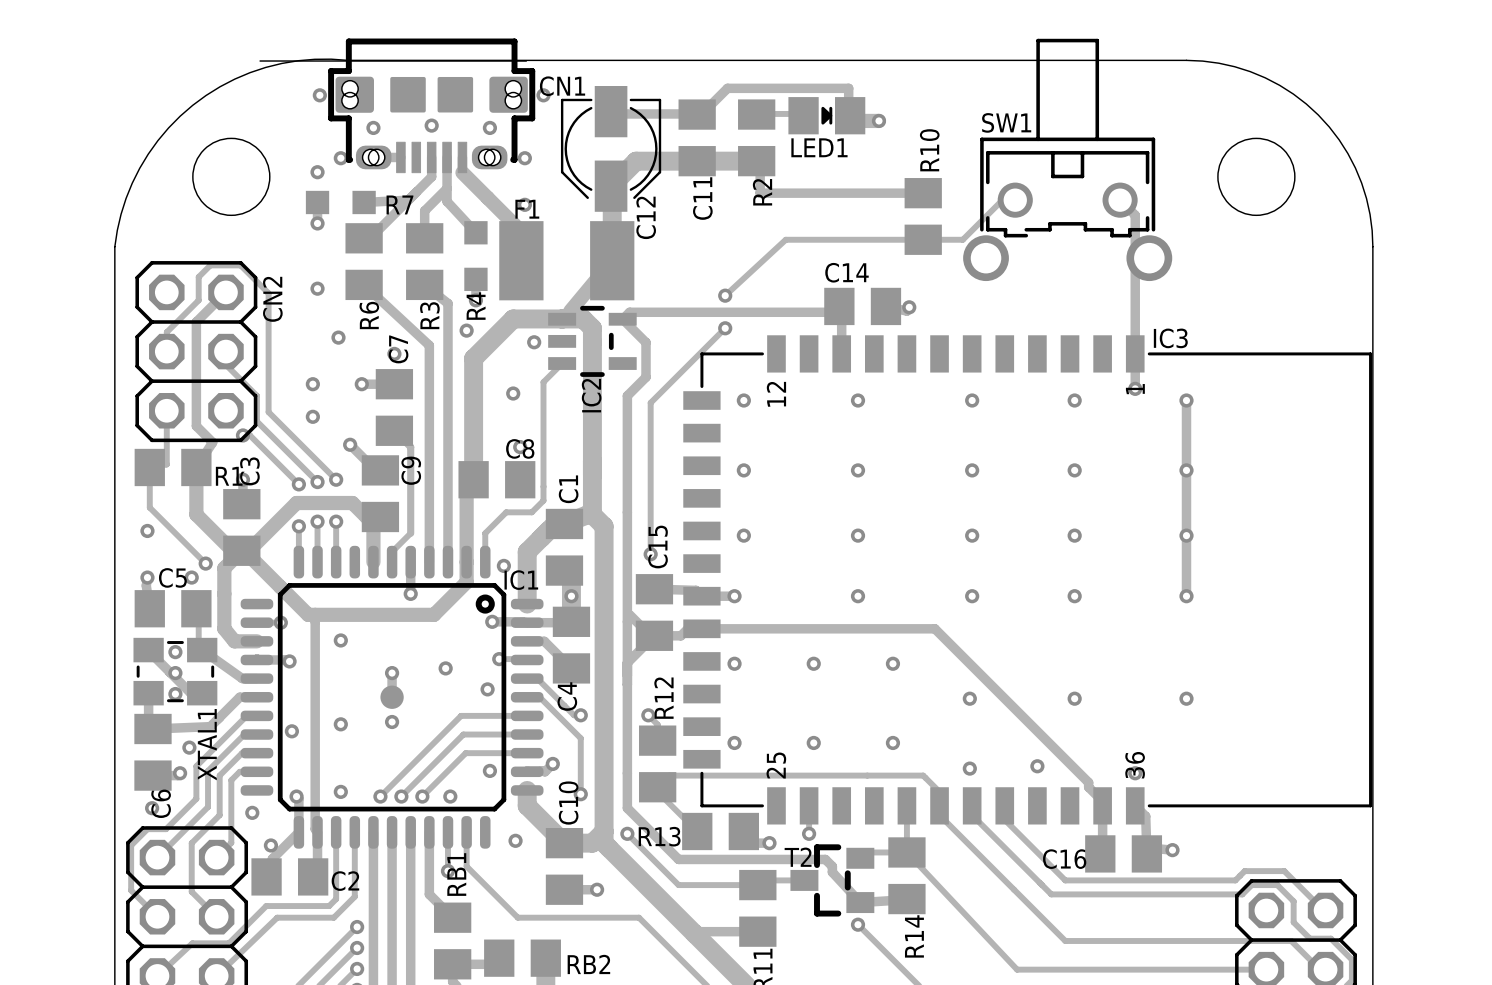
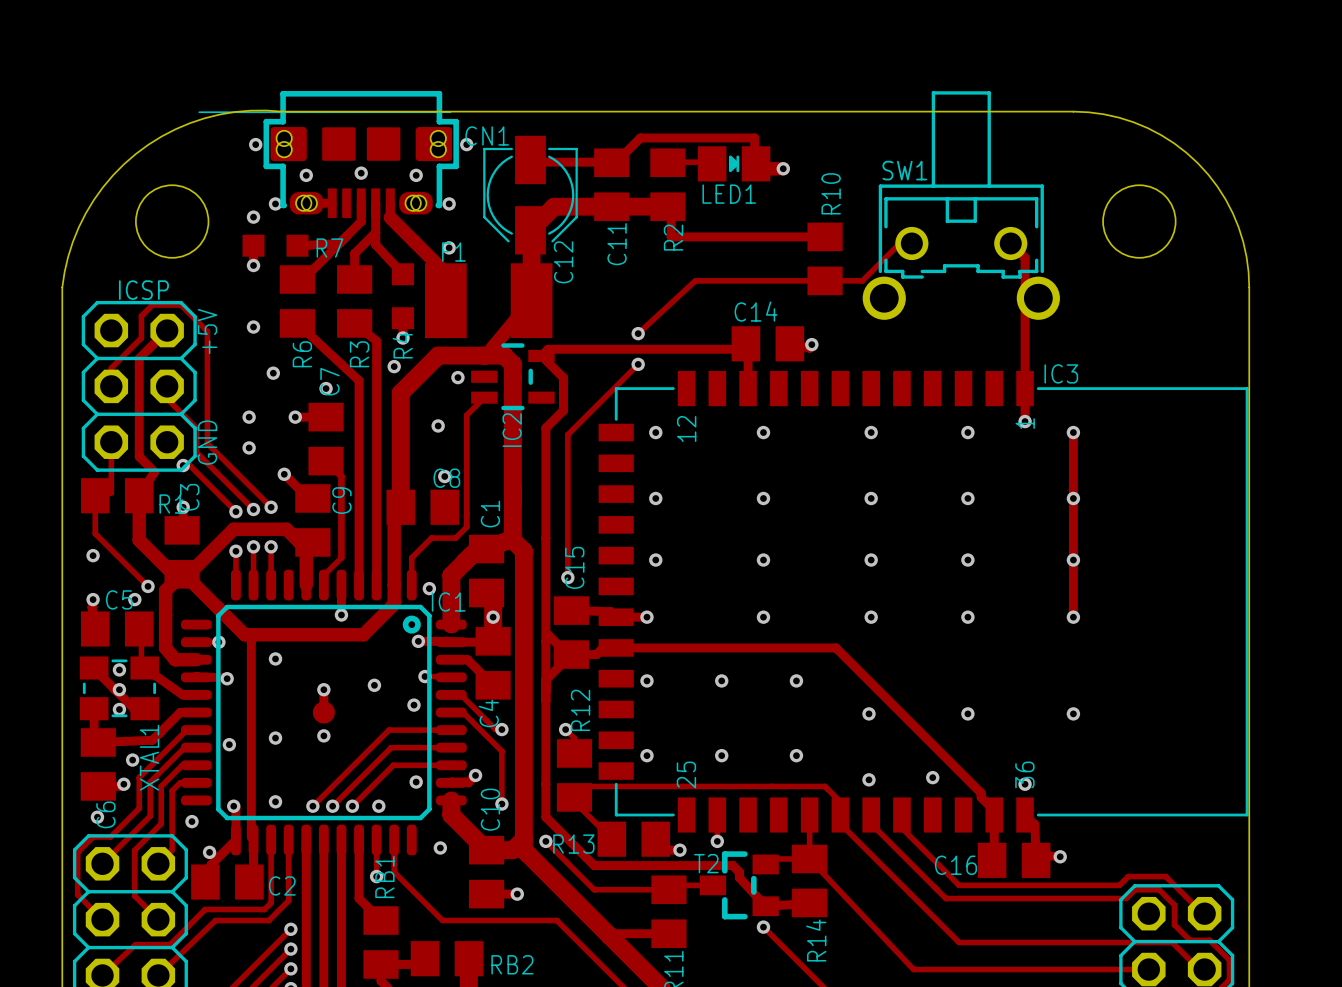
text: none -> +5V (207, 331)
CN2 name: CN2 (272, 299) -> ICSP (143, 290)
text: none -> GND (207, 442)

